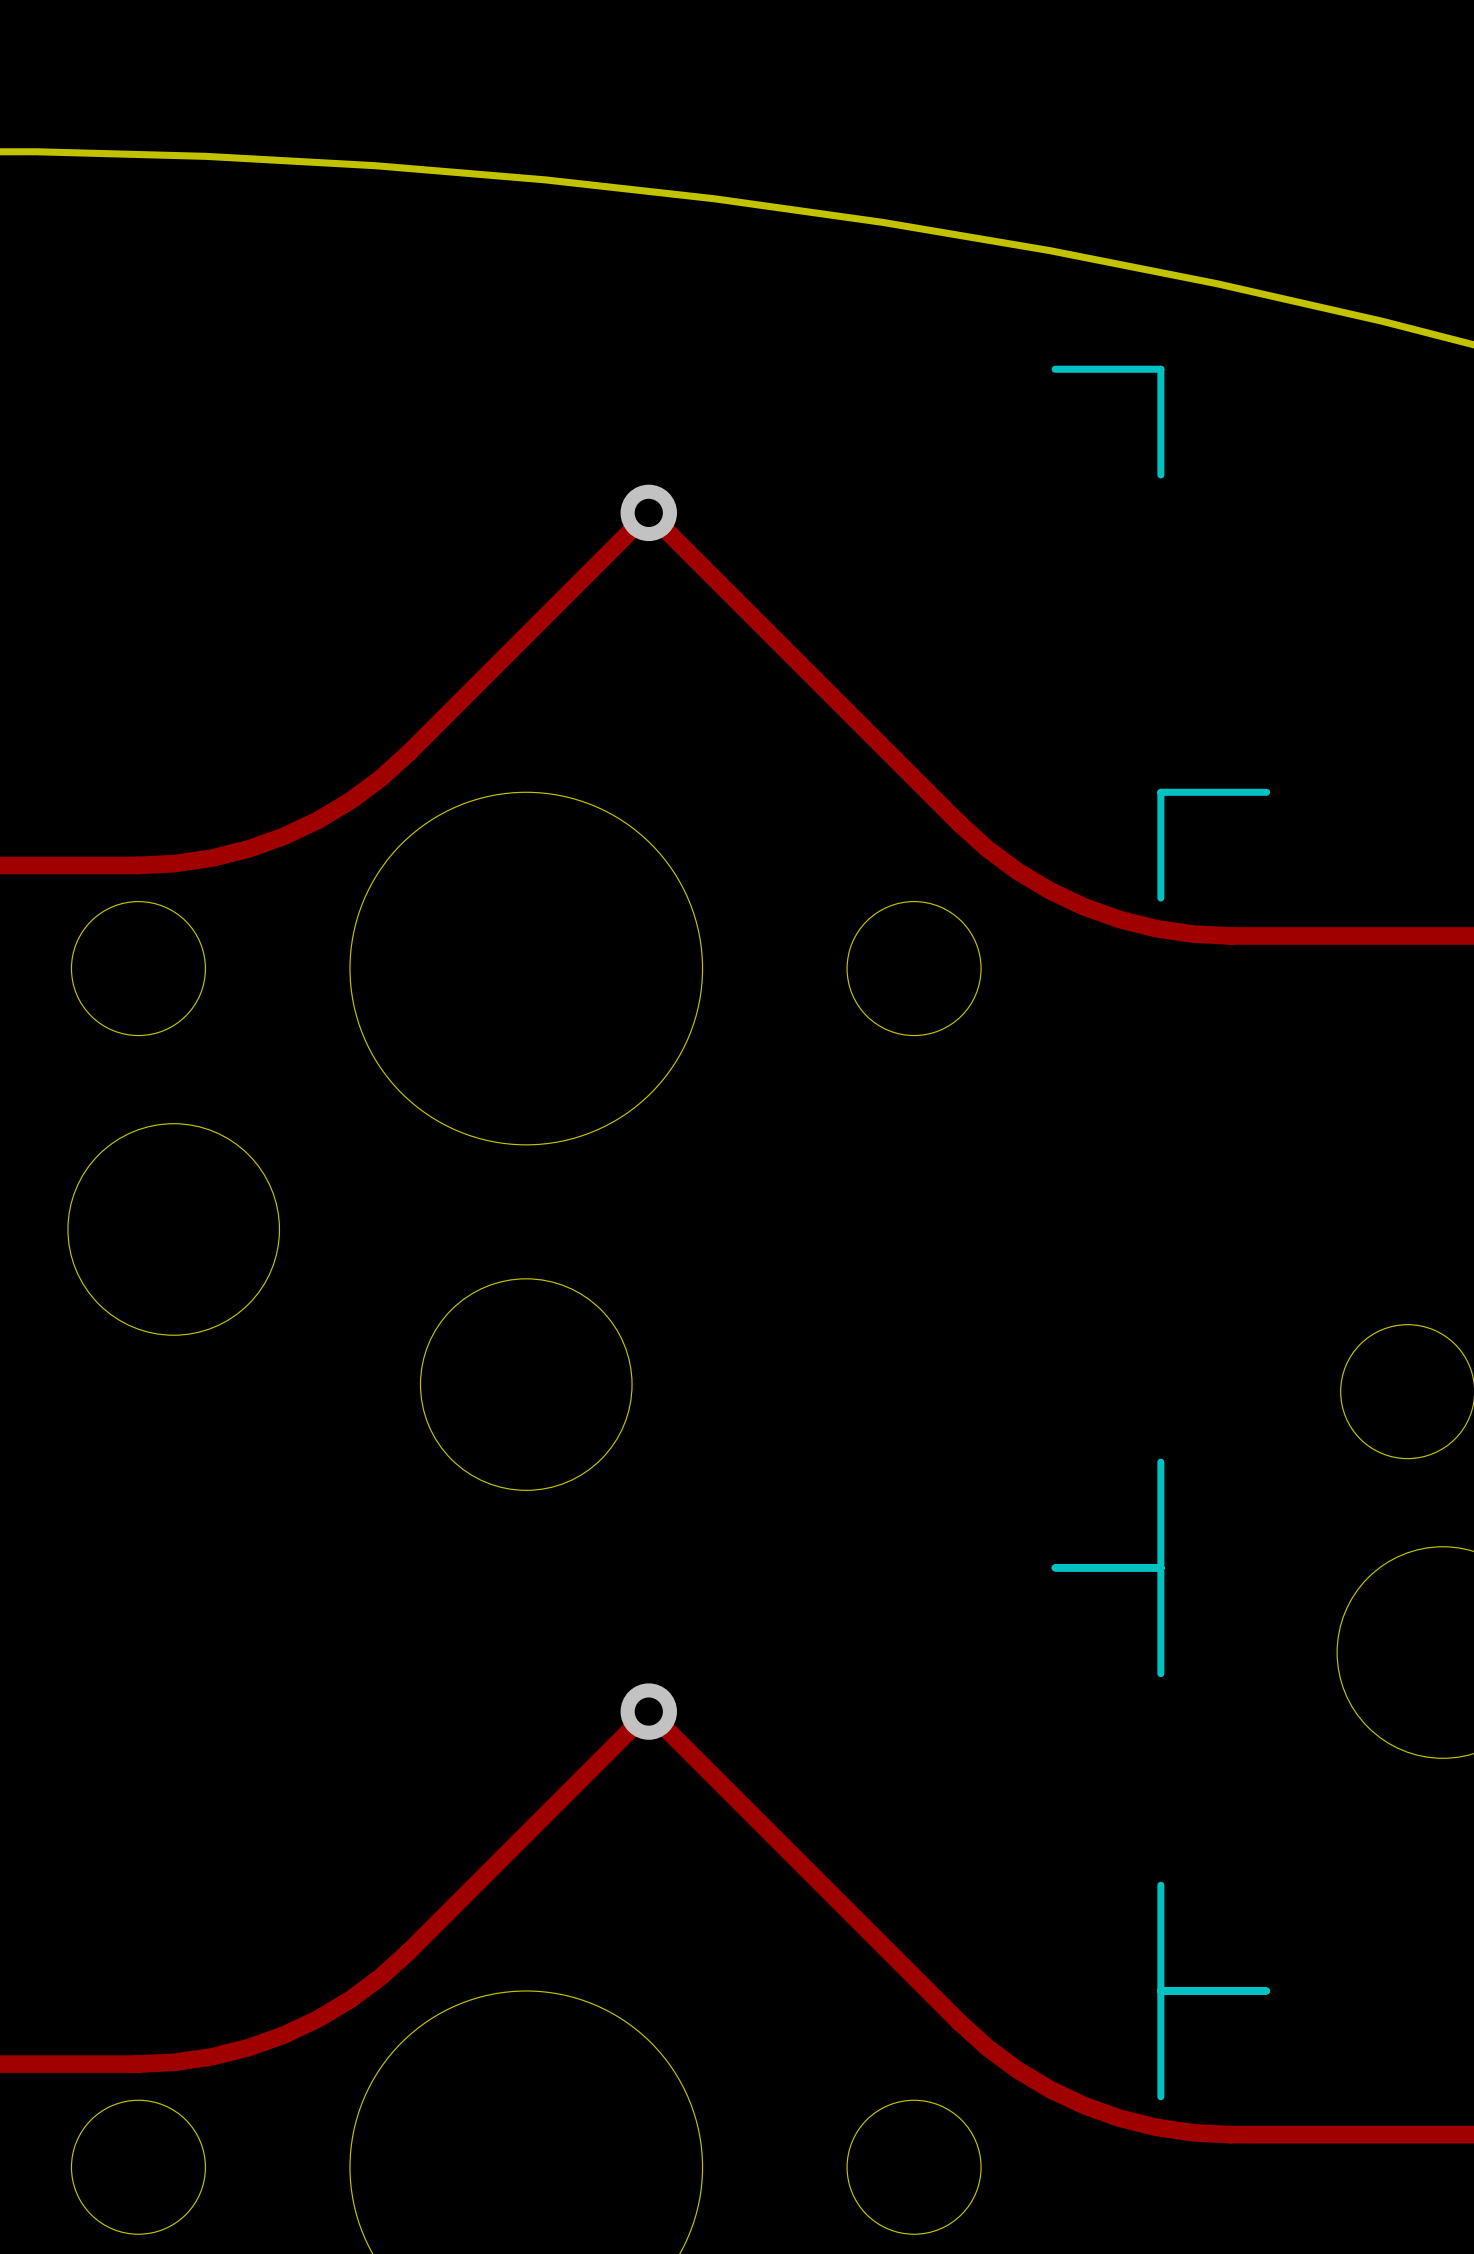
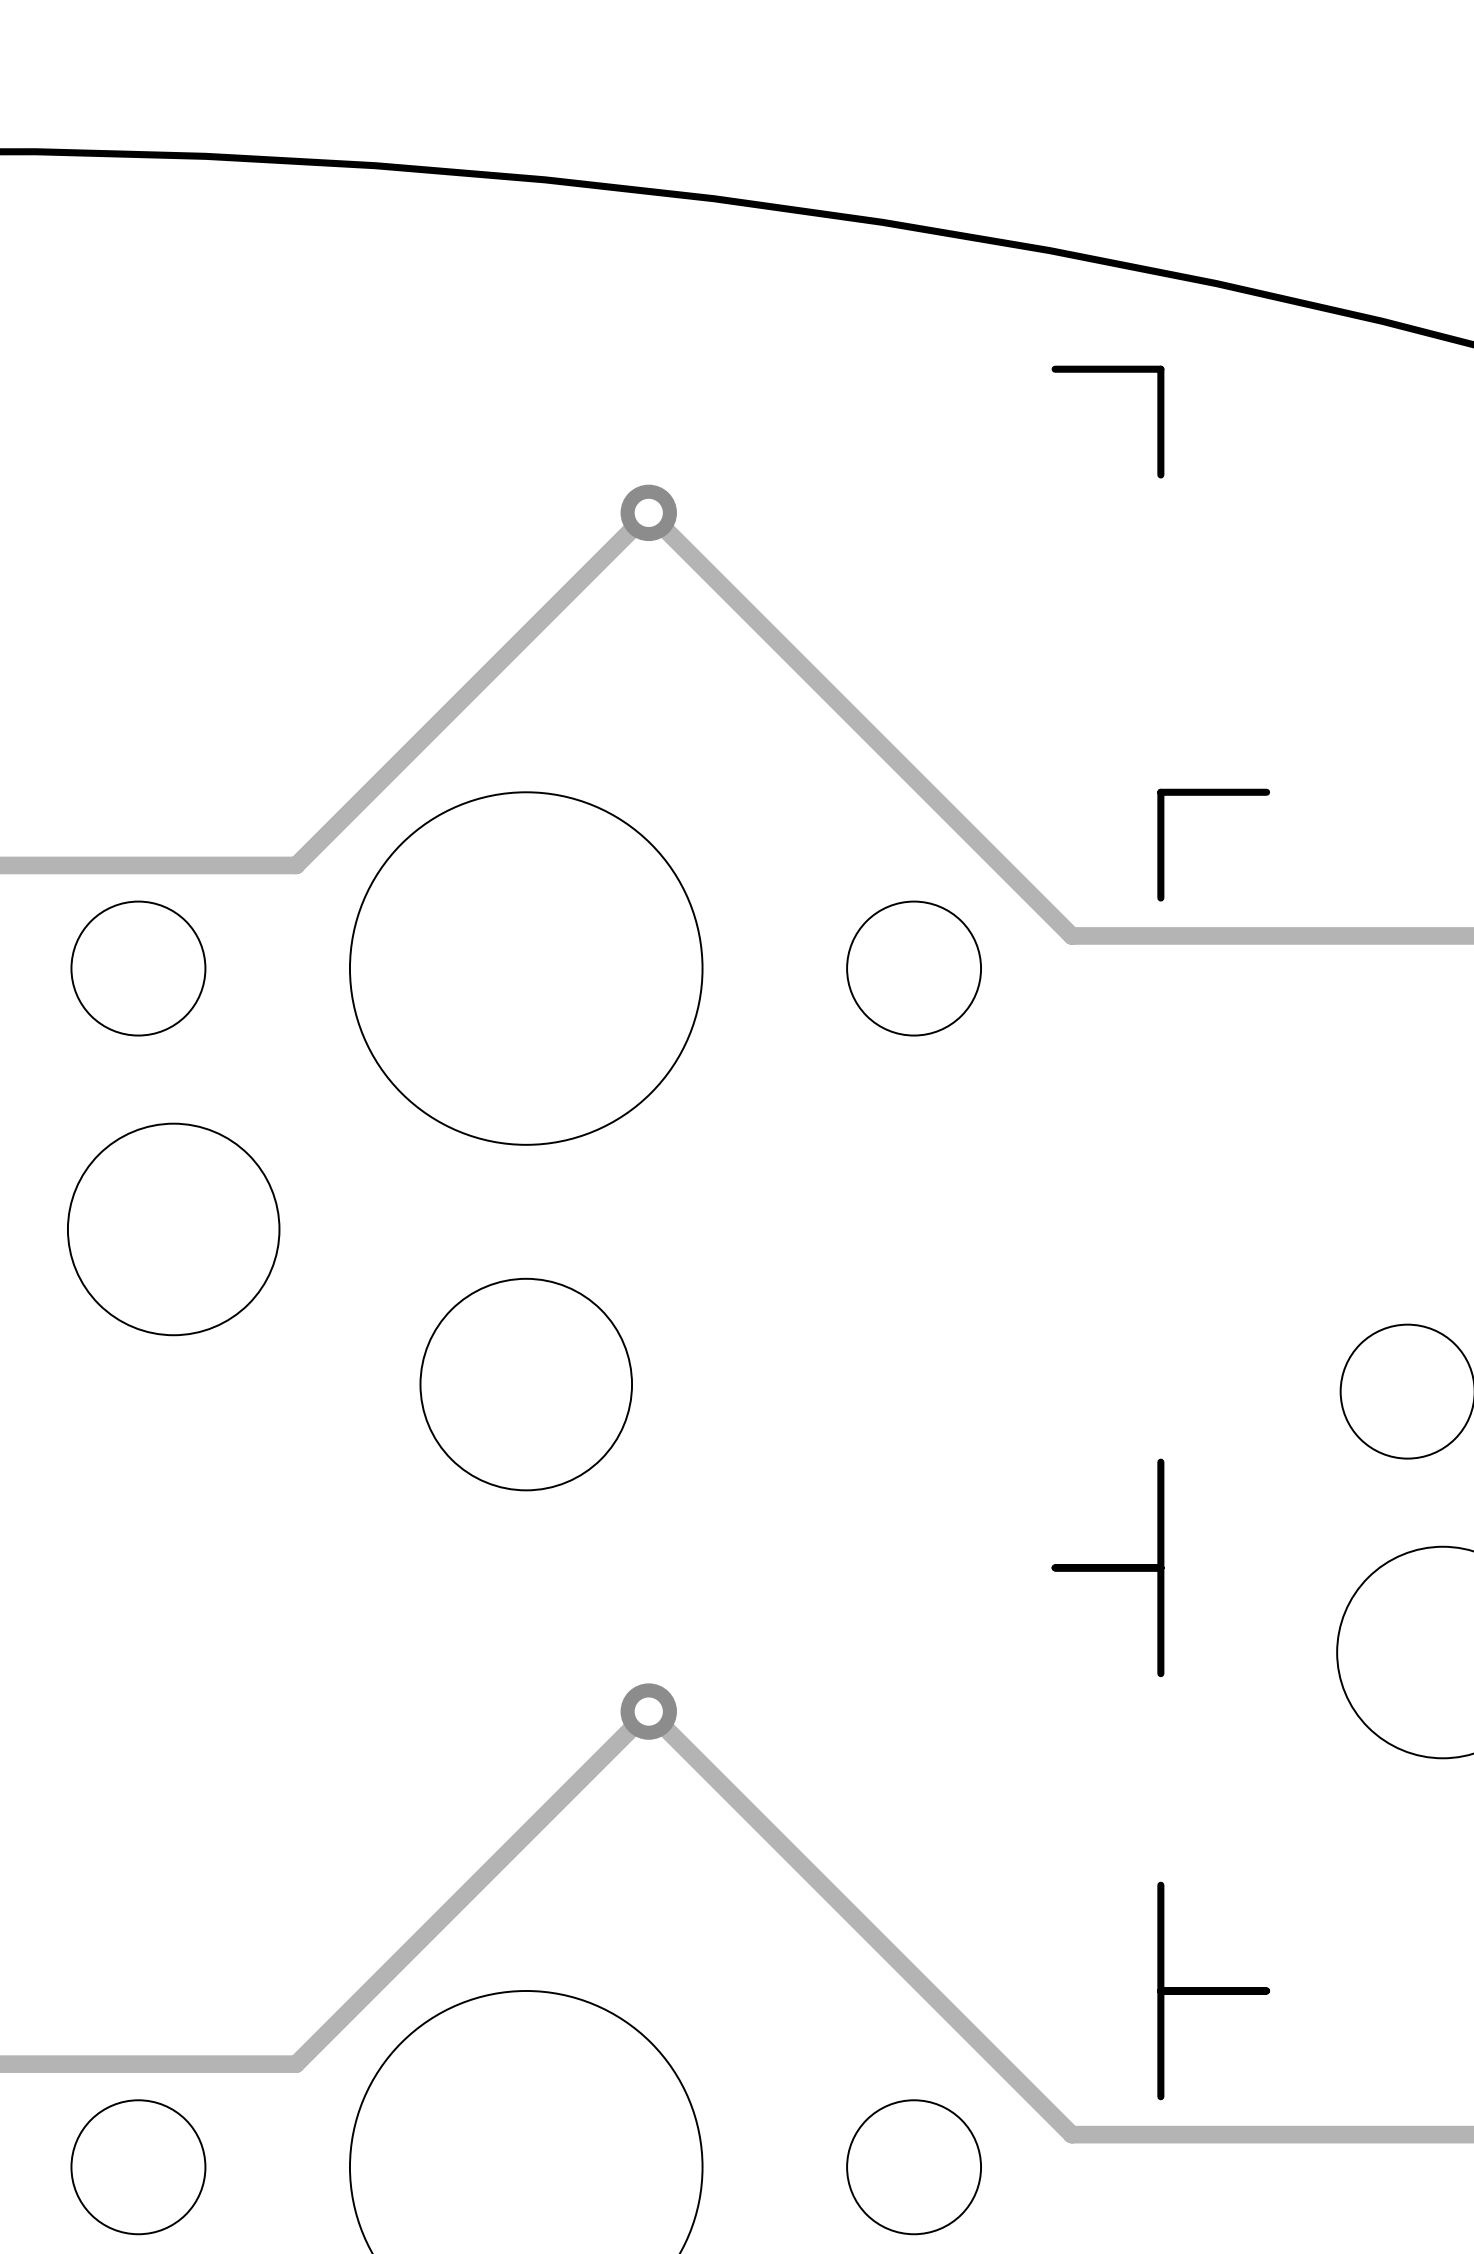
track: (408, 753) (380, 778) (350, 800) (318, 820) (284, 836) (248, 848) (212, 858) (174, 863) (137, 865) -> (408, 753) (296, 865) (137, 865)
track: (959, 823) (987, 848) (1017, 871) (1049, 890) (1083, 906) (1119, 919) (1155, 928) (1193, 934) (1230, 935) -> (959, 823) (1071, 935) (1230, 935)
track: (408, 1951) (380, 1977) (350, 1999) (318, 2018) (284, 2034) (248, 2047) (212, 2056) (174, 2062) (137, 2064) -> (408, 1951) (296, 2064) (137, 2064)
track: (959, 2022) (987, 2047) (1017, 2069) (1049, 2089) (1083, 2105) (1119, 2118) (1155, 2127) (1193, 2132) (1230, 2134) -> (959, 2022) (1071, 2134) (1230, 2134)

